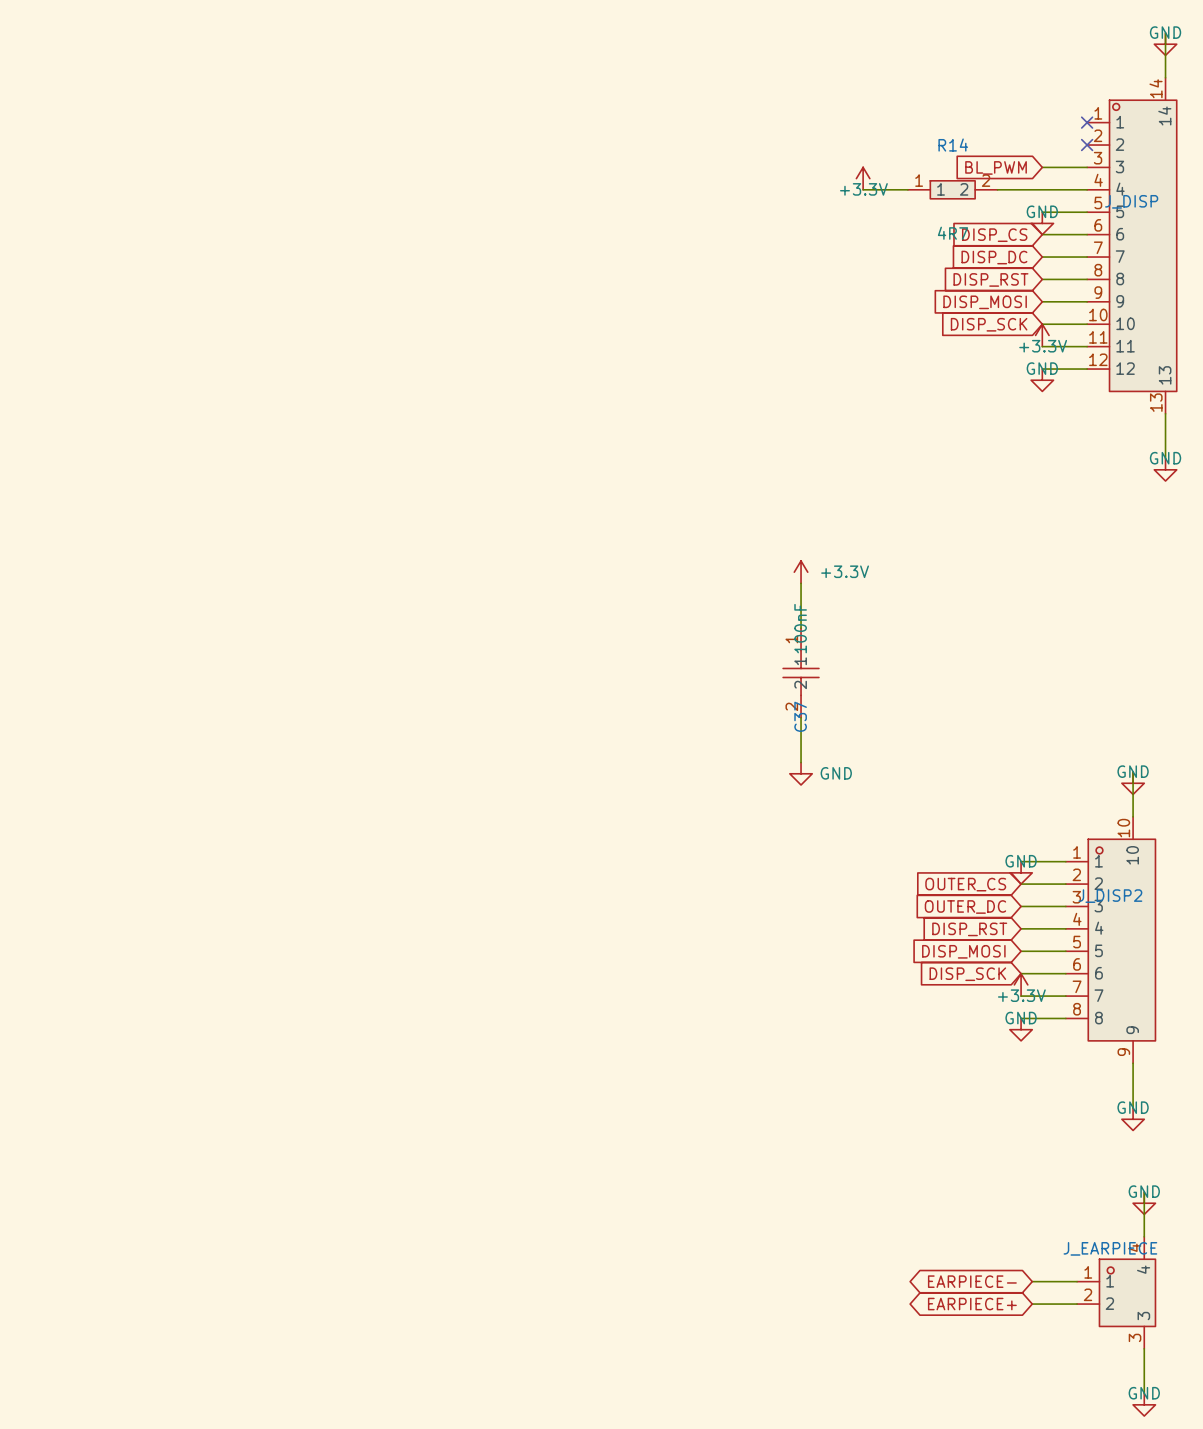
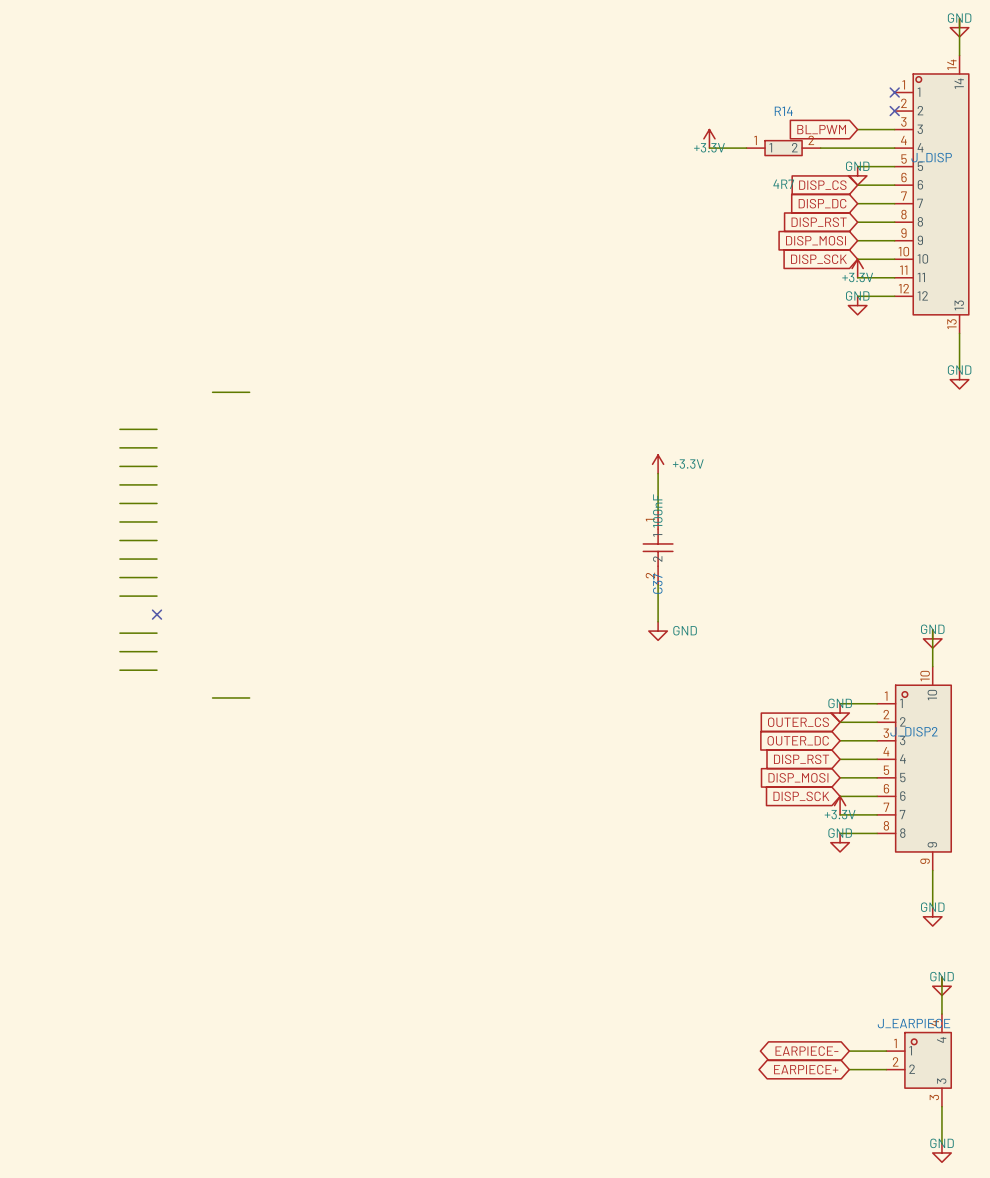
wire: none -> (212, 392) (249, 392)
wire: none -> (119, 429) (156, 429)
wire: none -> (119, 447) (156, 447)
wire: none -> (119, 466) (156, 466)
wire: none -> (119, 484) (156, 484)
wire: none -> (119, 503) (156, 503)
wire: none -> (119, 521) (156, 521)
wire: none -> (119, 540) (156, 540)
wire: none -> (119, 559) (156, 559)
wire: none -> (119, 577) (156, 577)
wire: none -> (119, 596) (156, 596)
no-connect mark: none -> (156, 614)
wire: none -> (119, 633) (156, 633)
wire: none -> (119, 651) (156, 651)
wire: none -> (119, 670) (156, 670)
wire: none -> (212, 697) (249, 697)

